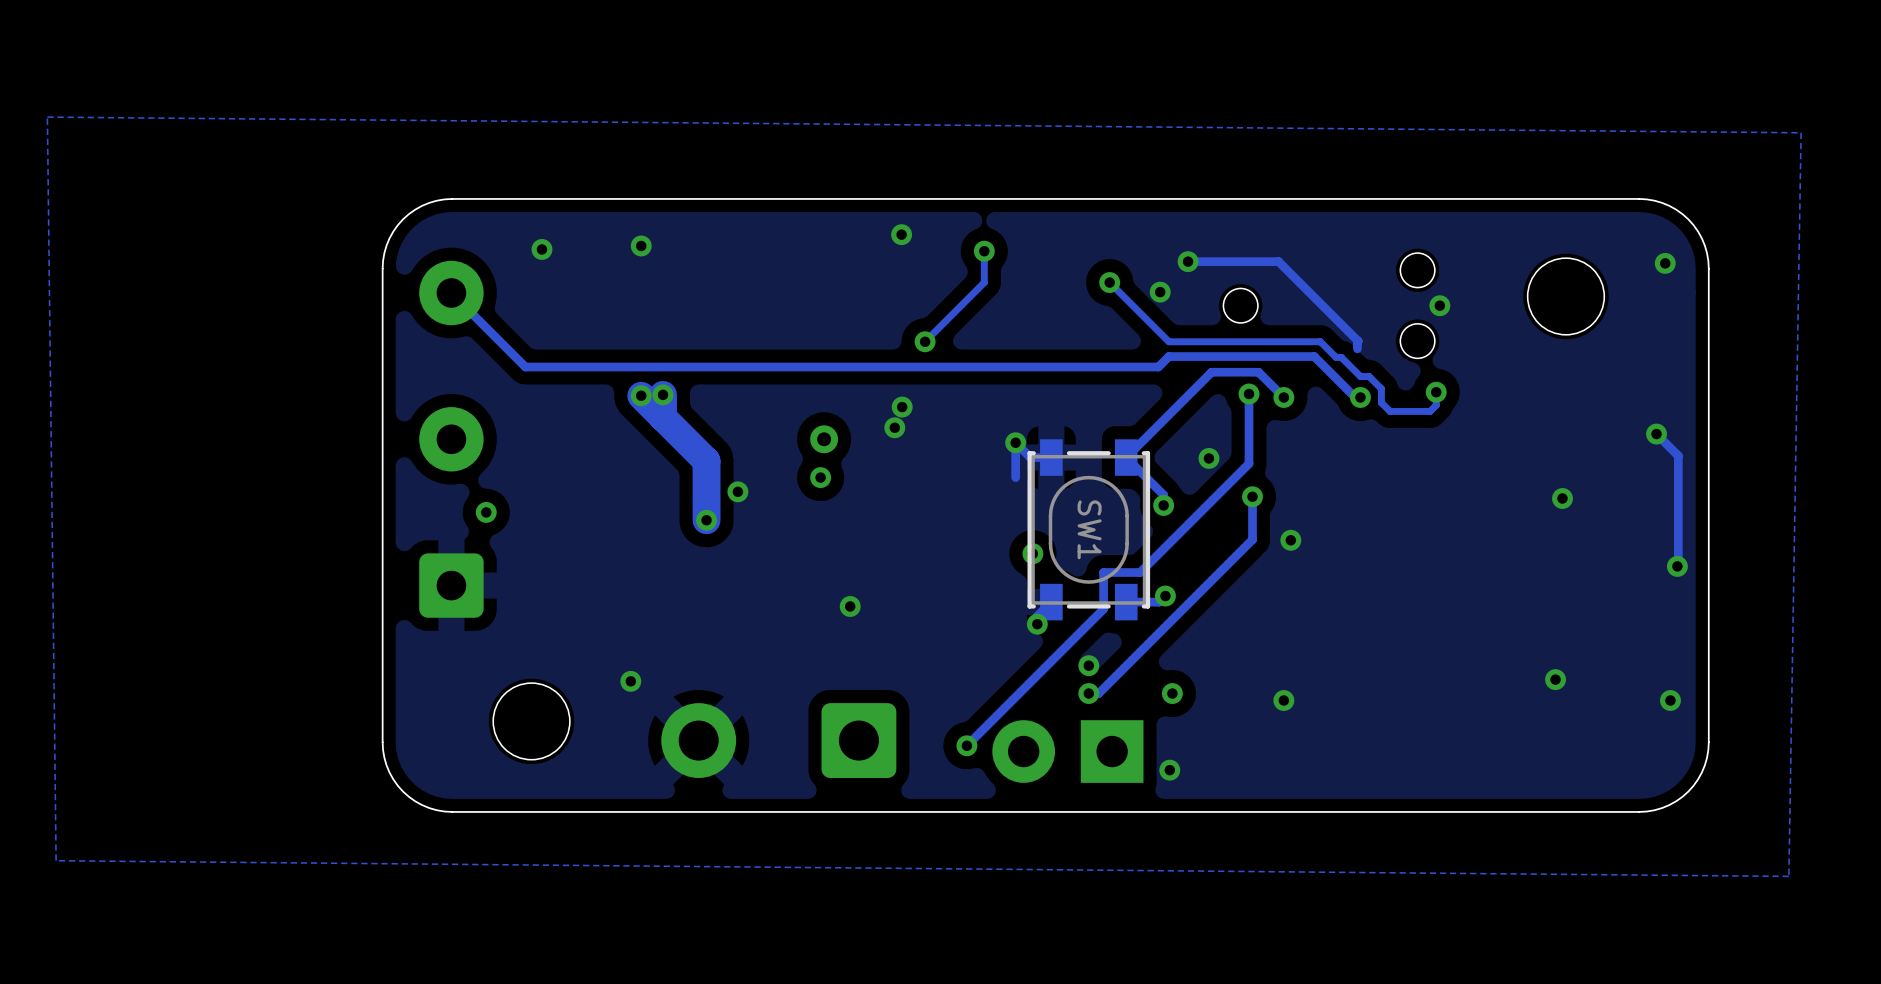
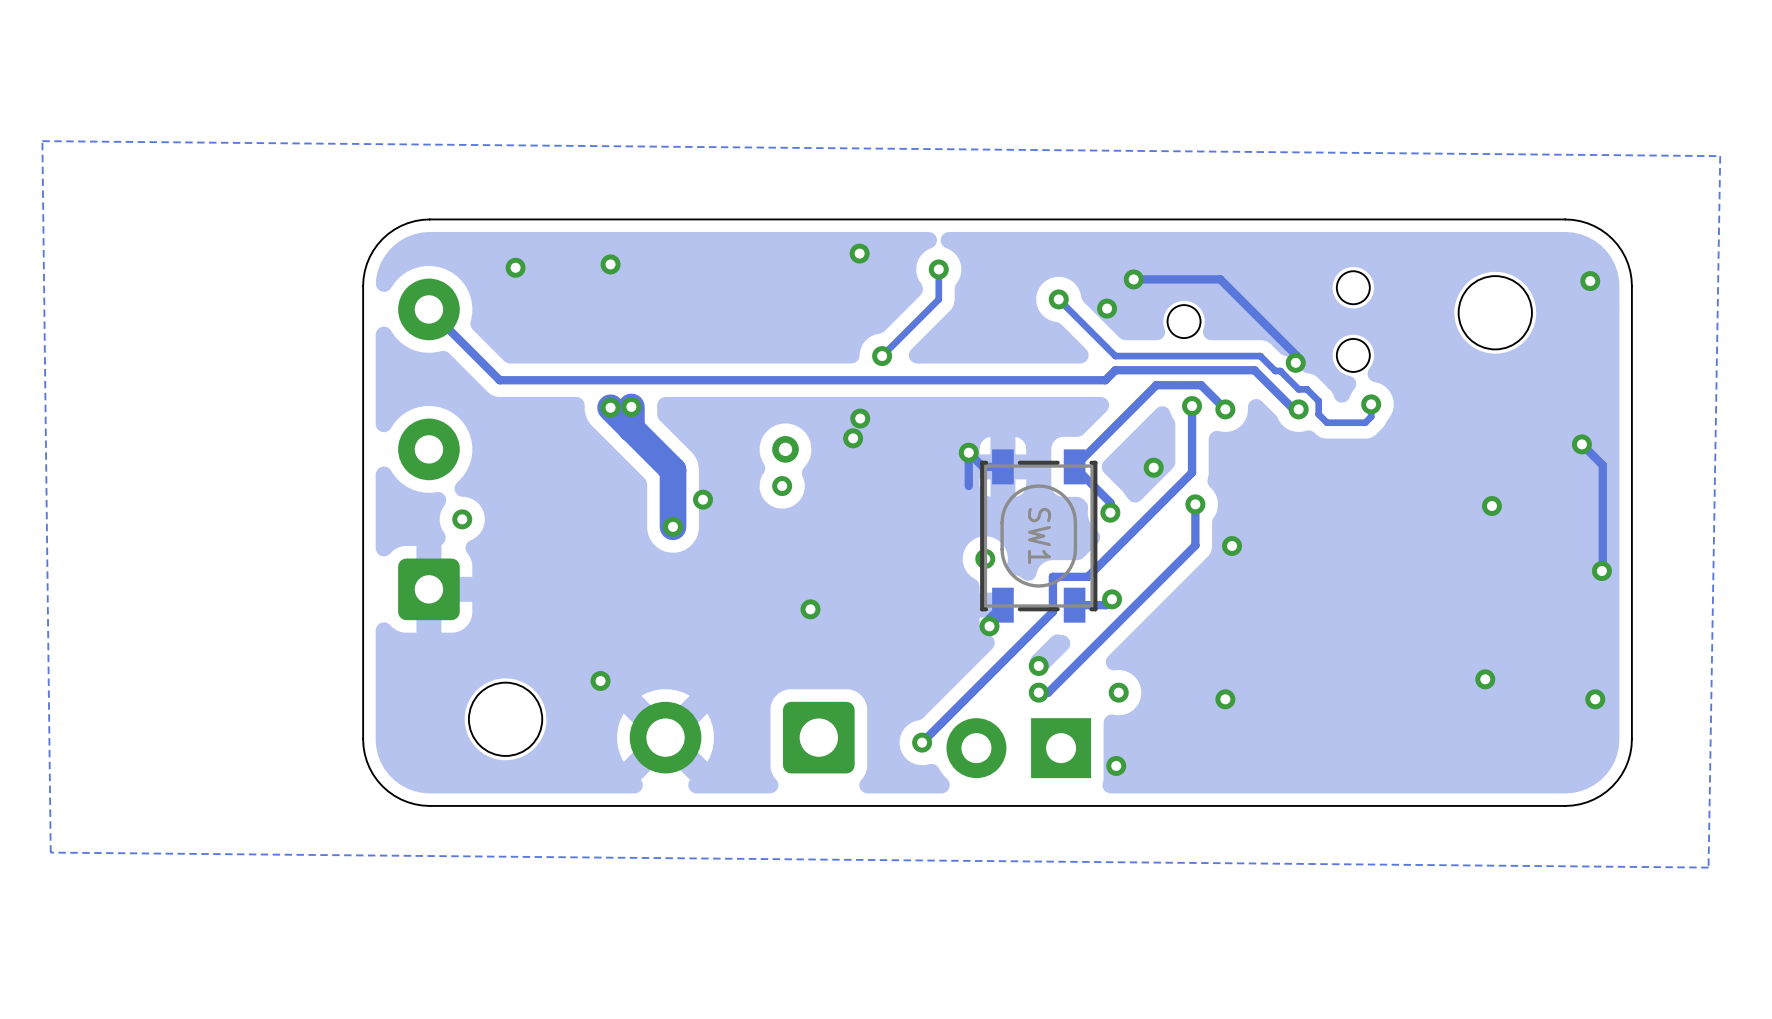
via position: (1439, 305) -> (1295, 362)

